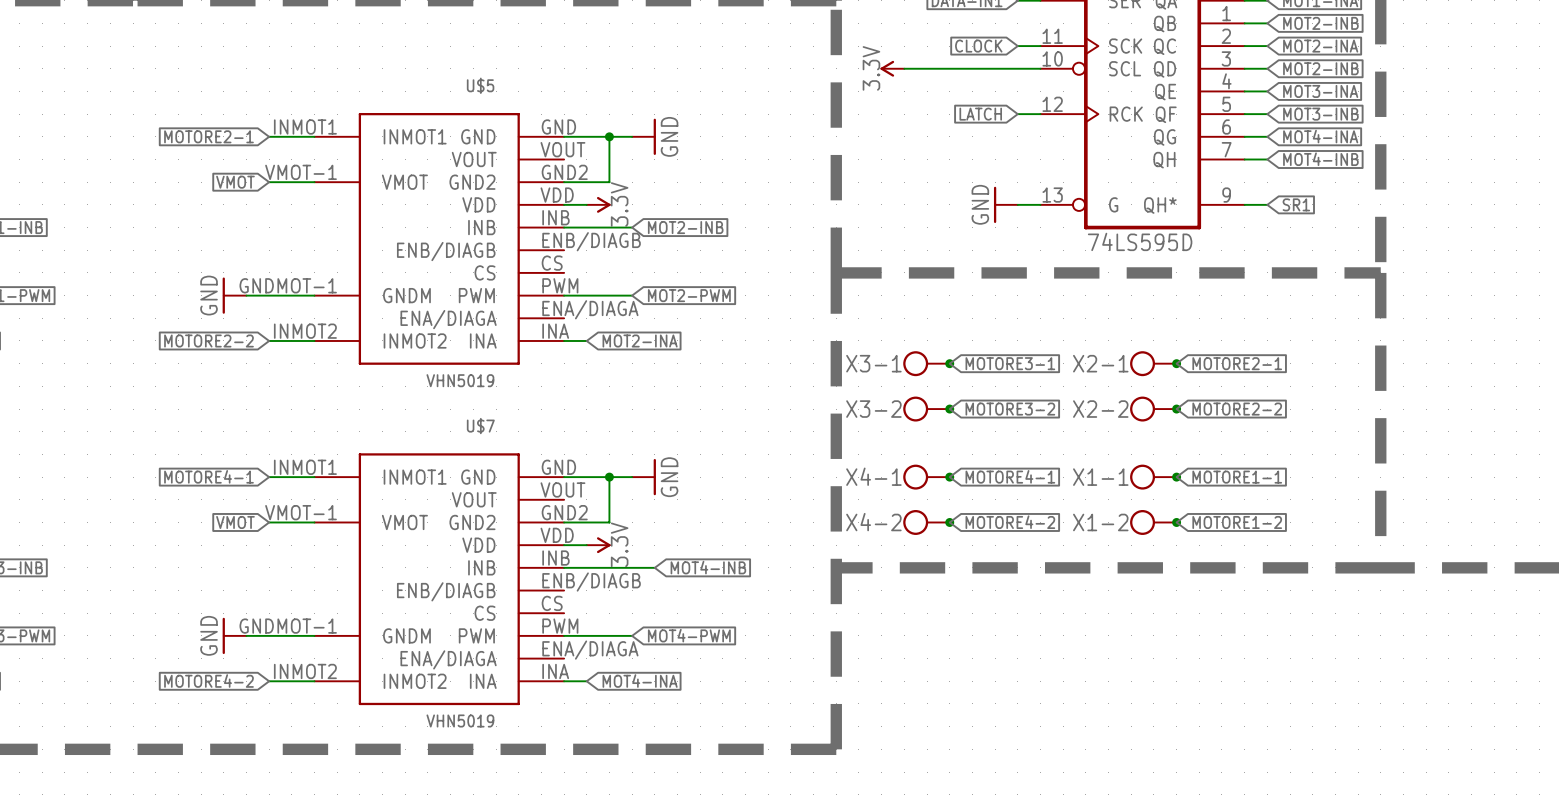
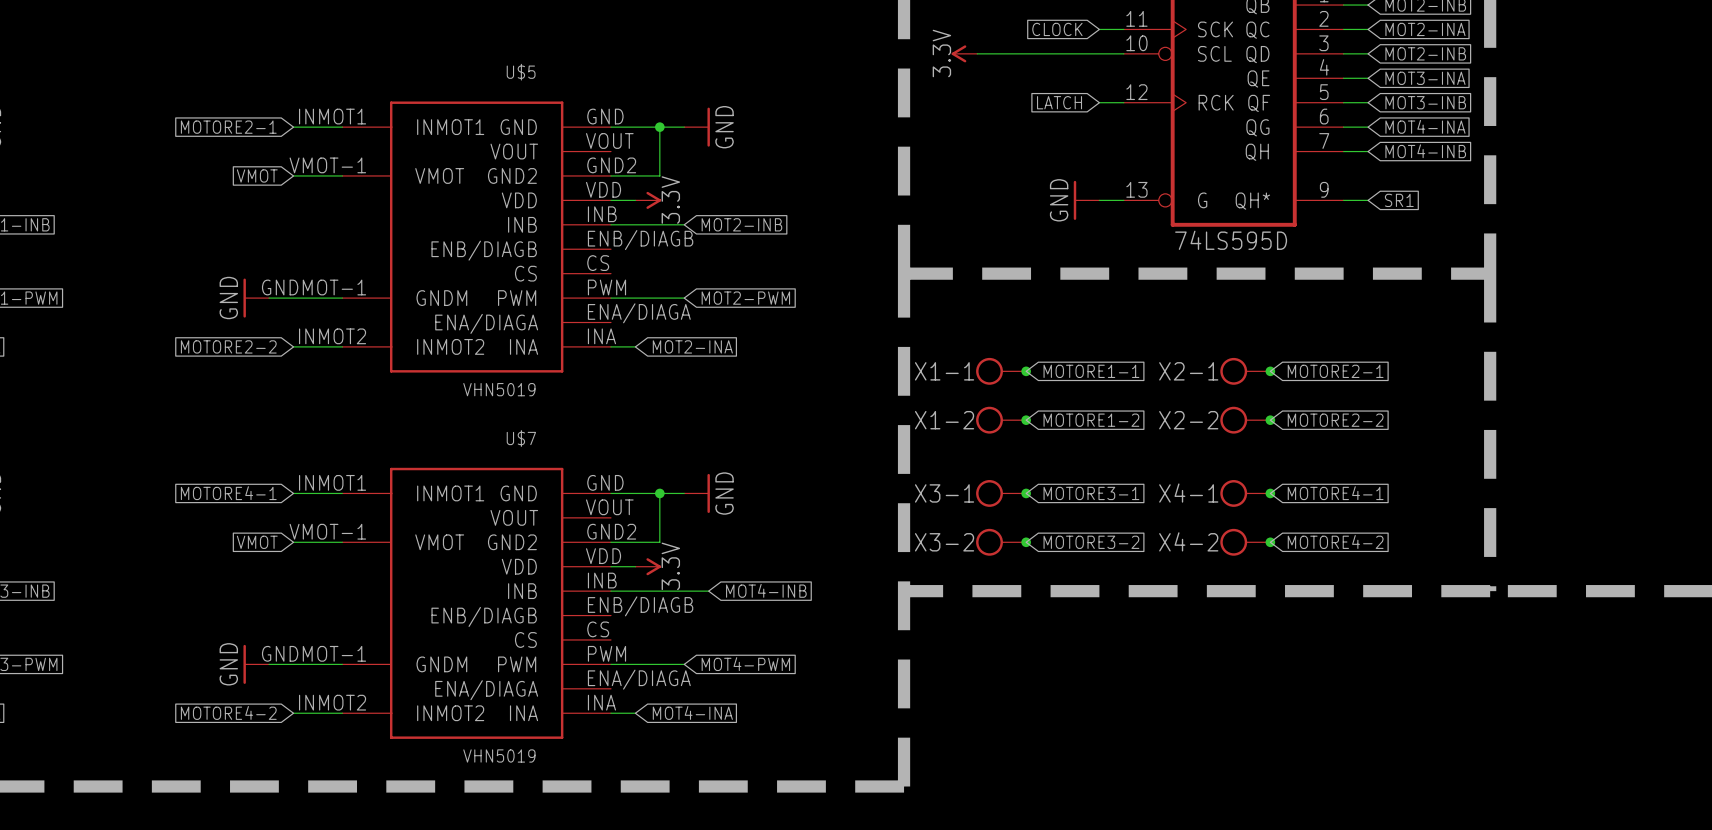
X3-1 name: X3-1 (873, 363) -> X1-1 (944, 371)
global label: MOTORE3-1 (1010, 363) -> MOTORE1-1 (1091, 371)
X3-2 name: X3-2 (873, 409) -> X1-2 (944, 420)
global label: MOTORE3-2 (1010, 409) -> MOTORE1-2 (1091, 420)
X4-1 name: X4-1 (873, 476) -> X3-1 (944, 493)
global label: MOTORE4-1 (1010, 476) -> MOTORE3-1 (1091, 493)
X1-1 name: X1-1 (1100, 477) -> X4-1 (1188, 493)
global label: MOTORE1-1 (1237, 477) -> MOTORE4-1 (1335, 493)
X4-2 name: X4-2 (873, 522) -> X3-2 (944, 542)
global label: MOTORE4-2 (1010, 522) -> MOTORE3-2 (1091, 542)
X1-2 name: X1-2 (1100, 522) -> X4-2 (1188, 541)
global label: MOTORE1-2 (1237, 522) -> MOTORE4-2 (1335, 542)

